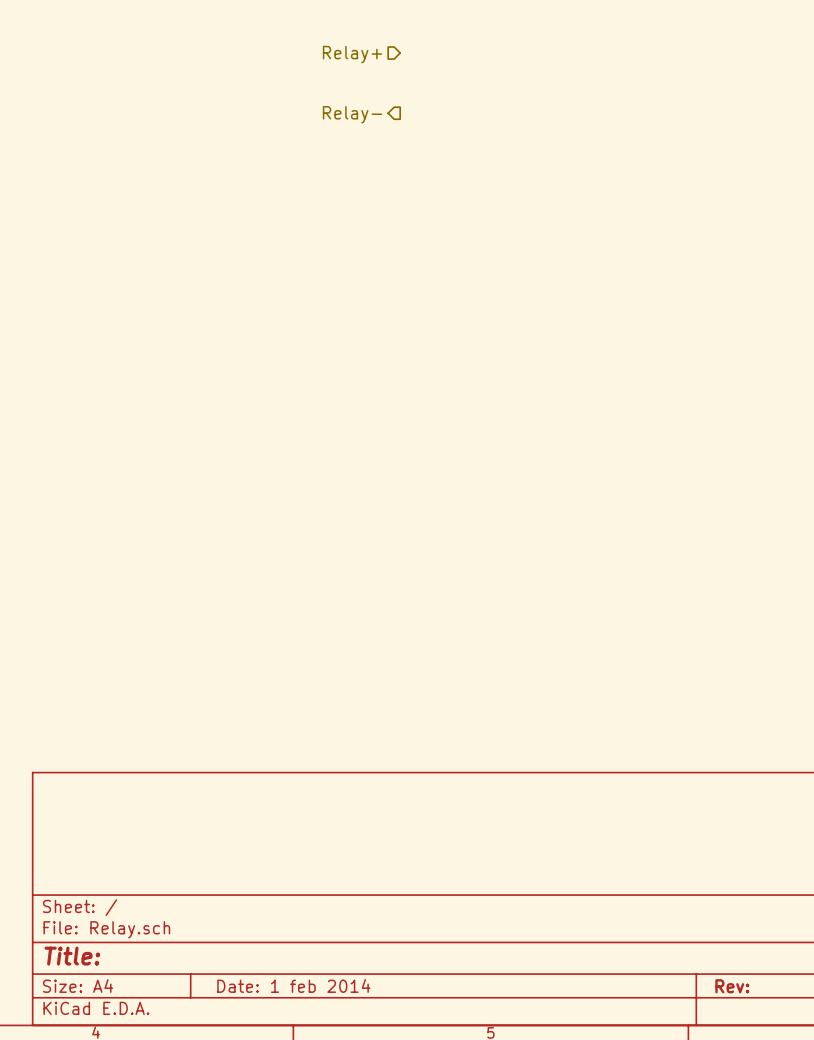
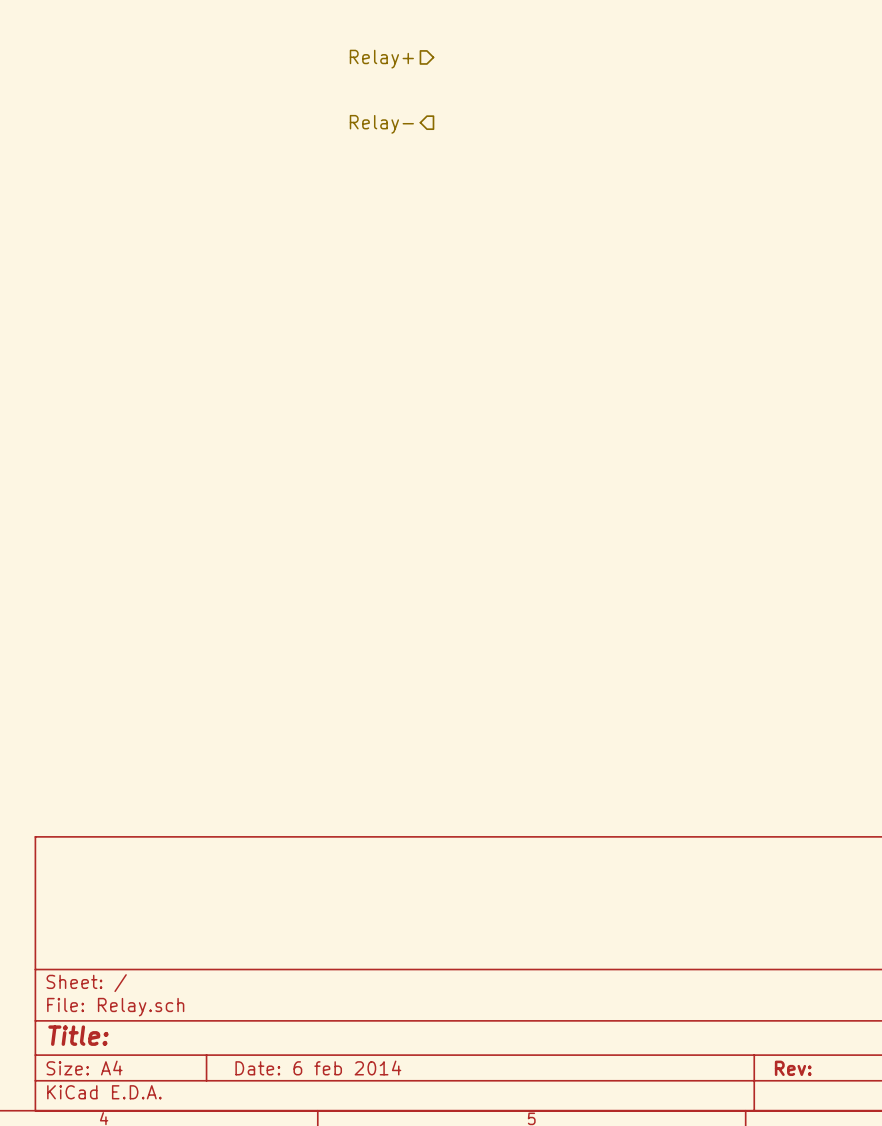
title block: Date: 1 feb 2014 (293, 985) -> Date: 6 feb 2014 (318, 1068)

